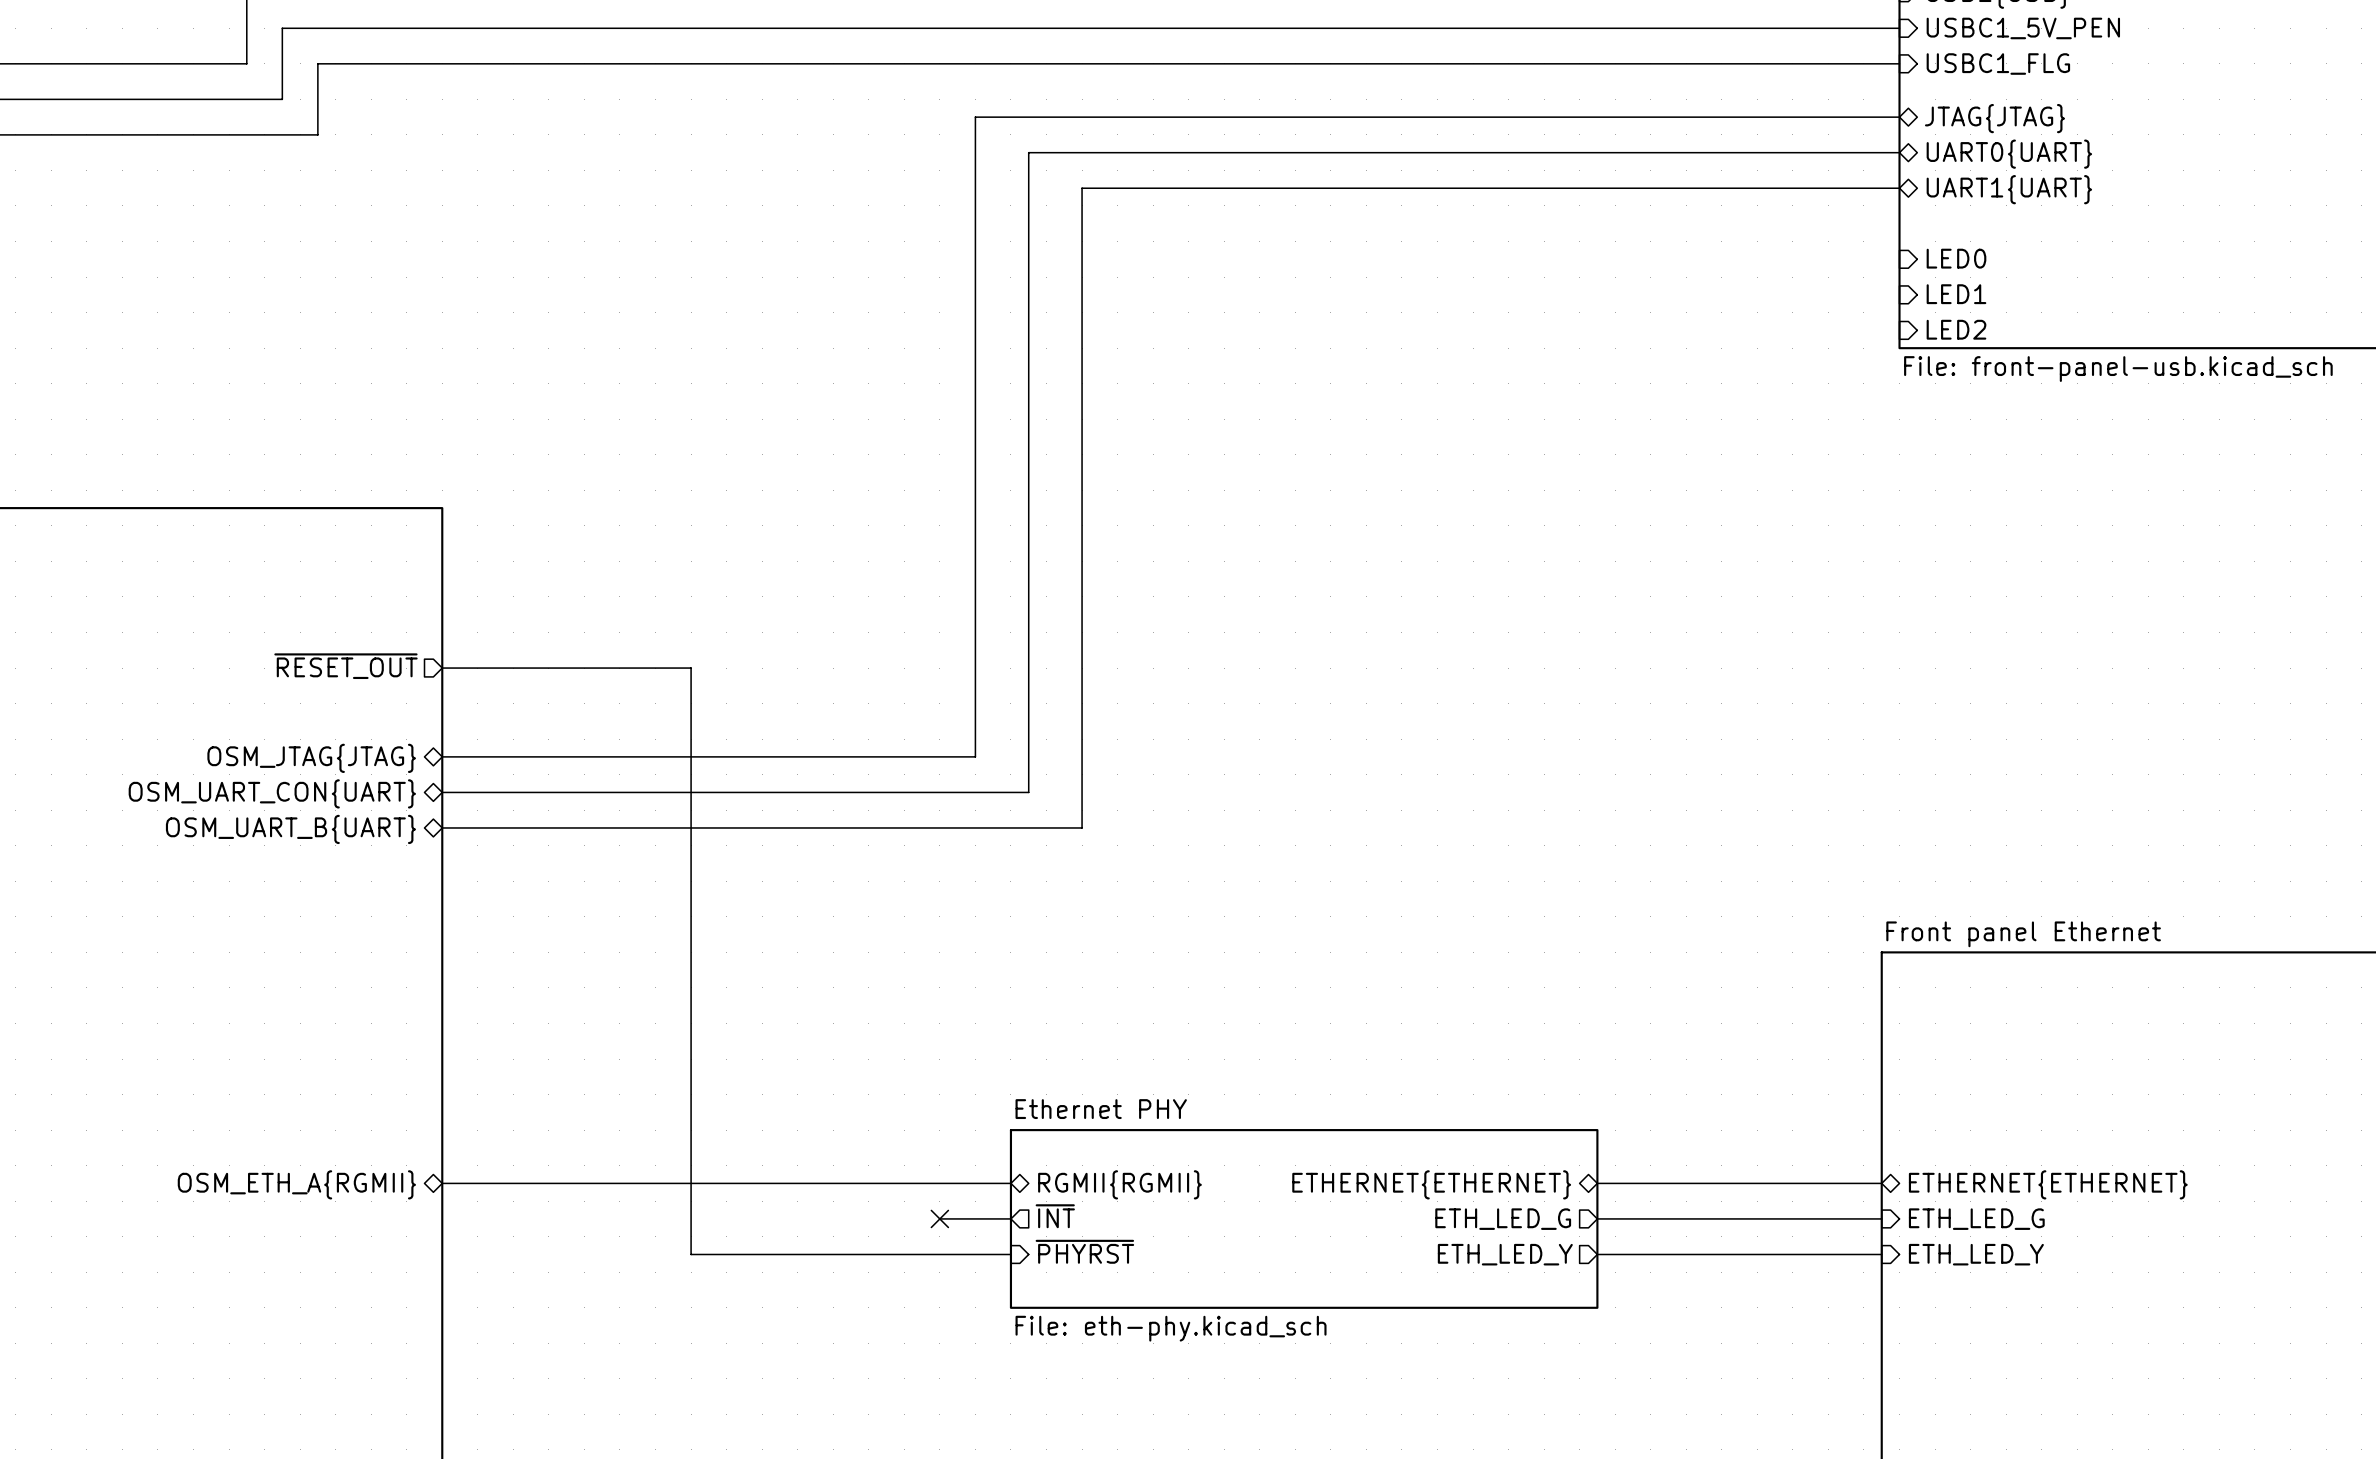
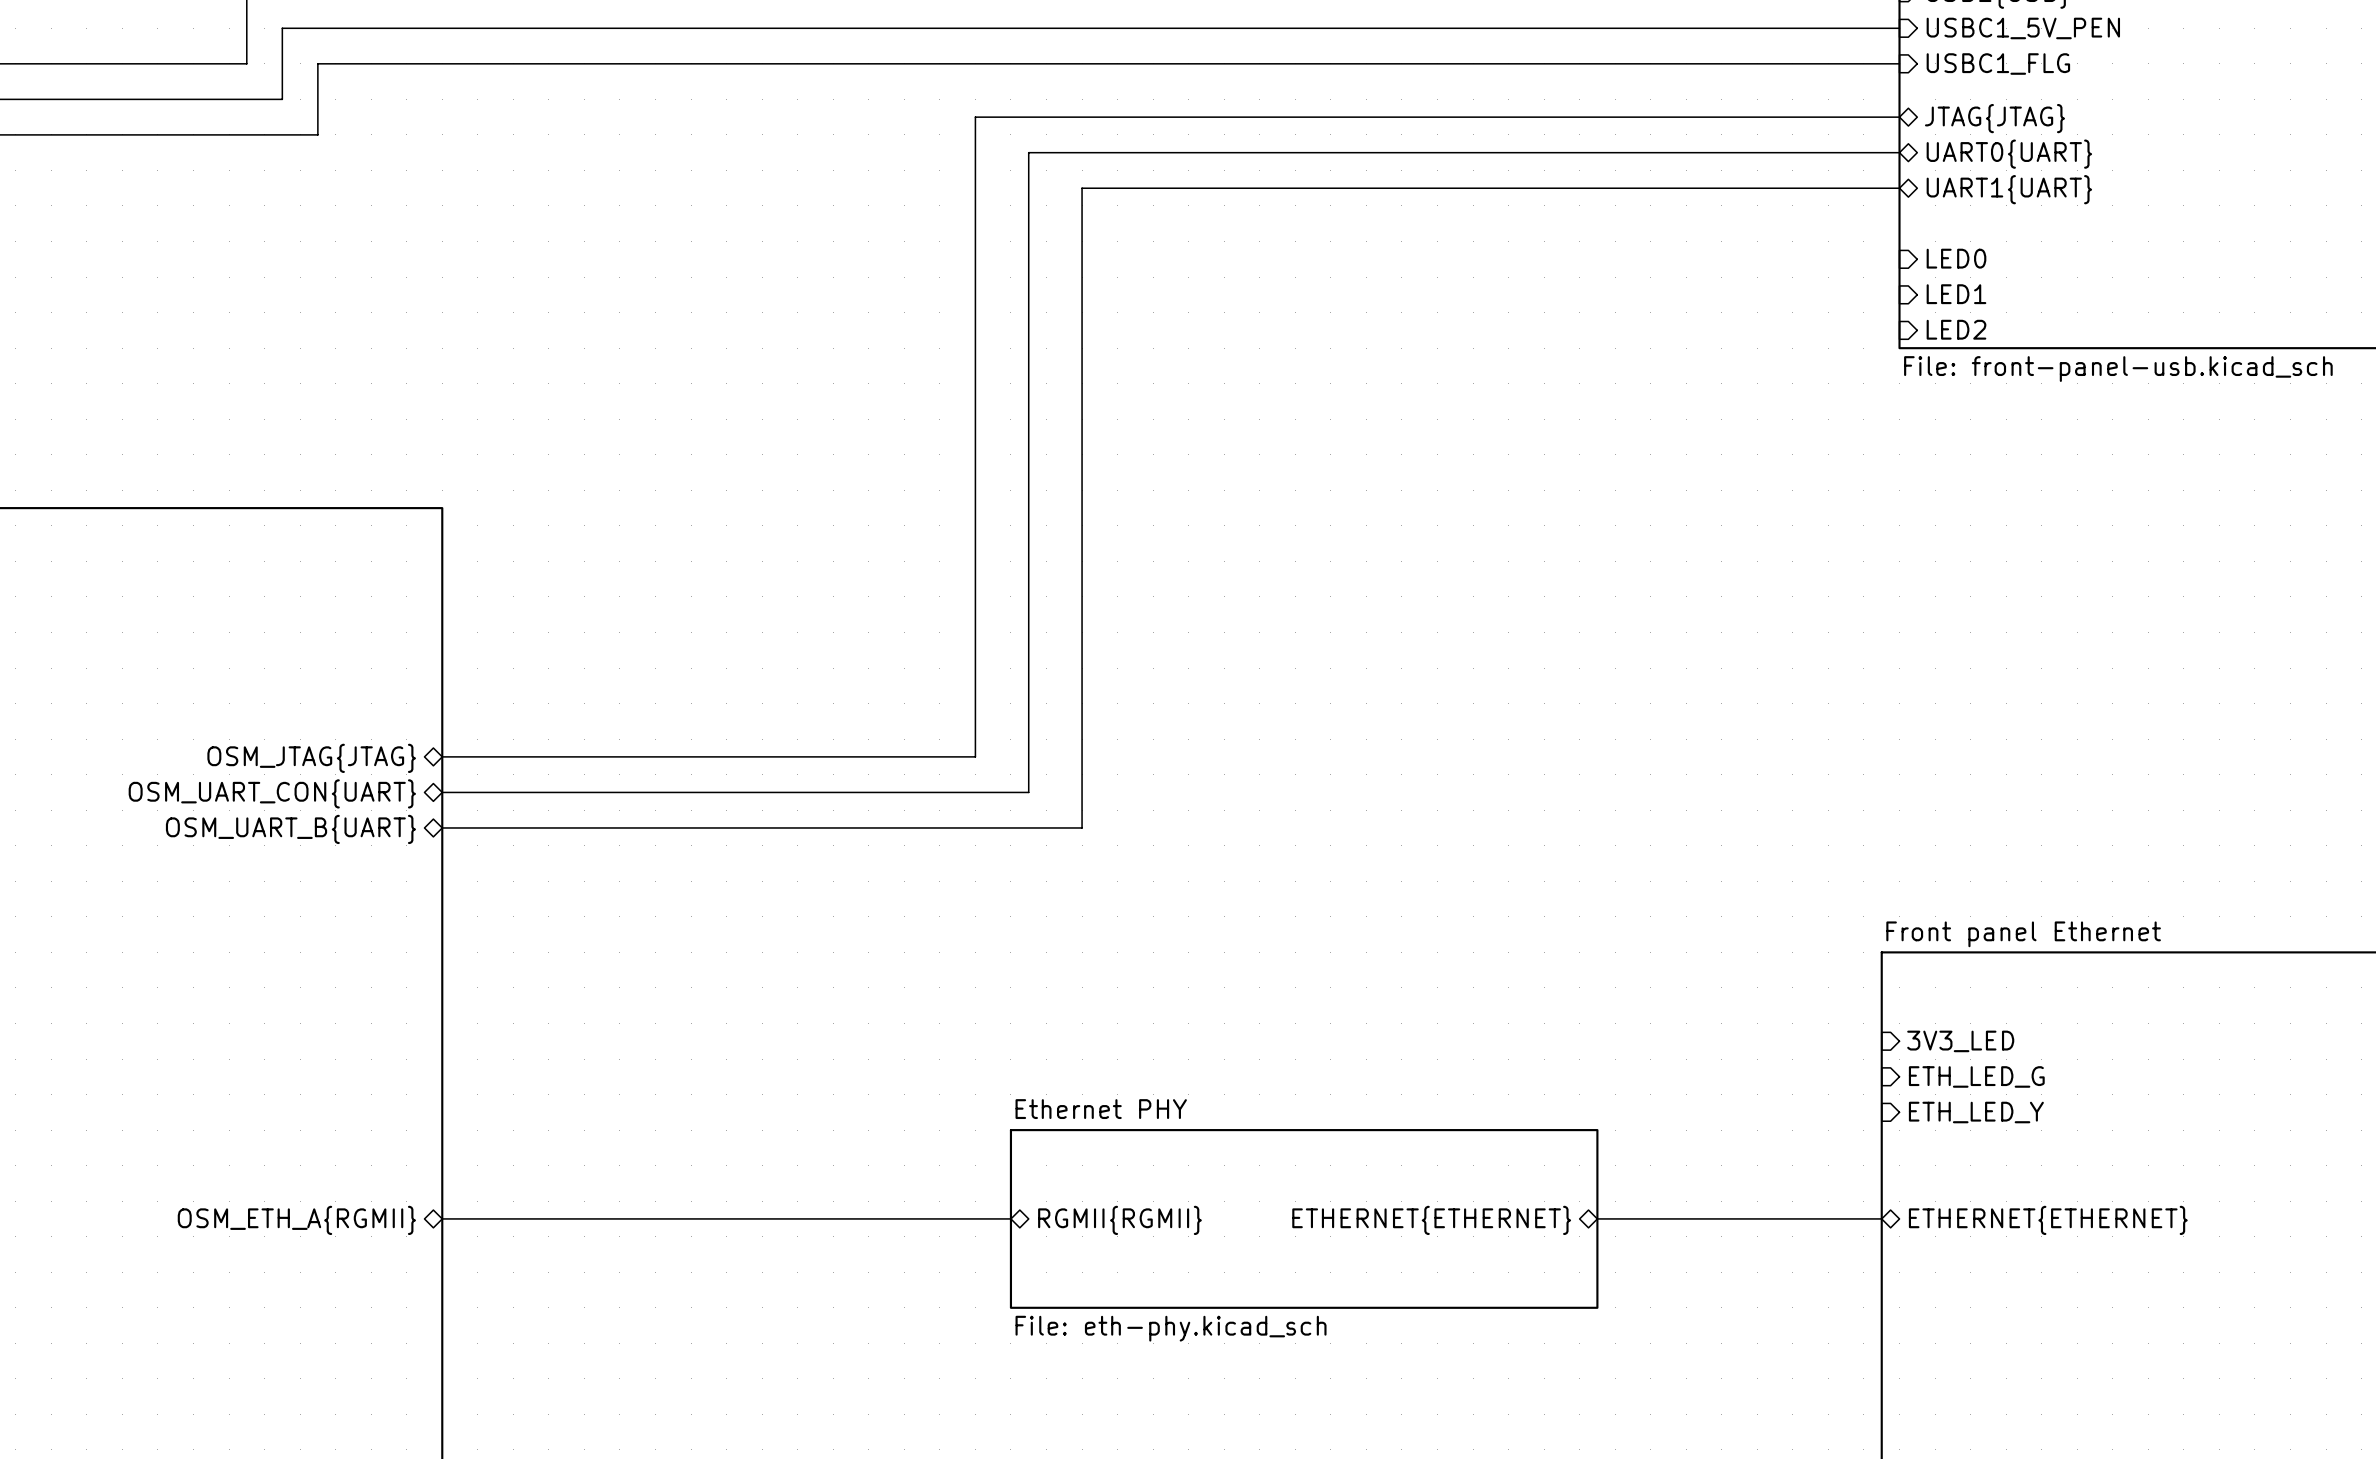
sheet pin: ~{RESET_OUT} (345, 666) -> none
wire: (442, 668) (691, 668) (691, 1254) (1010, 1254) -> none
sheet pin: none -> 3V3_LED (1960, 1041)
sheet pin: none -> ETH_LED_G (1976, 1076)
bus: (442, 1183) (1010, 1183) -> (442, 1218) (1010, 1218)
bus: (1597, 1183) (1881, 1183) -> (1597, 1218) (1881, 1218)
sheet pin position: OSM_ETH_A{RGMII} (296, 1184) -> OSM_ETH_A{RGMII} (296, 1220)
sheet pin: RGMII{RGMII} (1119, 1184) -> none
sheet pin: ETHERNET{ETHERNET} (1431, 1184) -> none
sheet pin: ETHERNET{ETHERNET} (2048, 1184) -> none
sheet pin shape: output (1055, 1216) -> bidirectional (1119, 1220)
sheet pin: ~{INT} (1055, 1216) -> RGMII{RGMII} (1119, 1220)
no-connect mark: (939, 1218) -> none
sheet pin shape: output (1503, 1219) -> bidirectional (1431, 1220)
sheet pin: ETH_LED_G (1503, 1219) -> ETHERNET{ETHERNET} (1431, 1220)
sheet pin shape: input (1976, 1219) -> bidirectional (2048, 1220)
sheet pin: ETH_LED_G (1976, 1219) -> ETHERNET{ETHERNET} (2048, 1220)
sheet pin: ~{PHYRST} (1084, 1251) -> none
sheet pin: ETH_LED_Y (1505, 1254) -> none
wire: (1597, 1254) (1881, 1254) -> none
sheet pin position: ETH_LED_Y (1976, 1254) -> ETH_LED_Y (1976, 1112)

